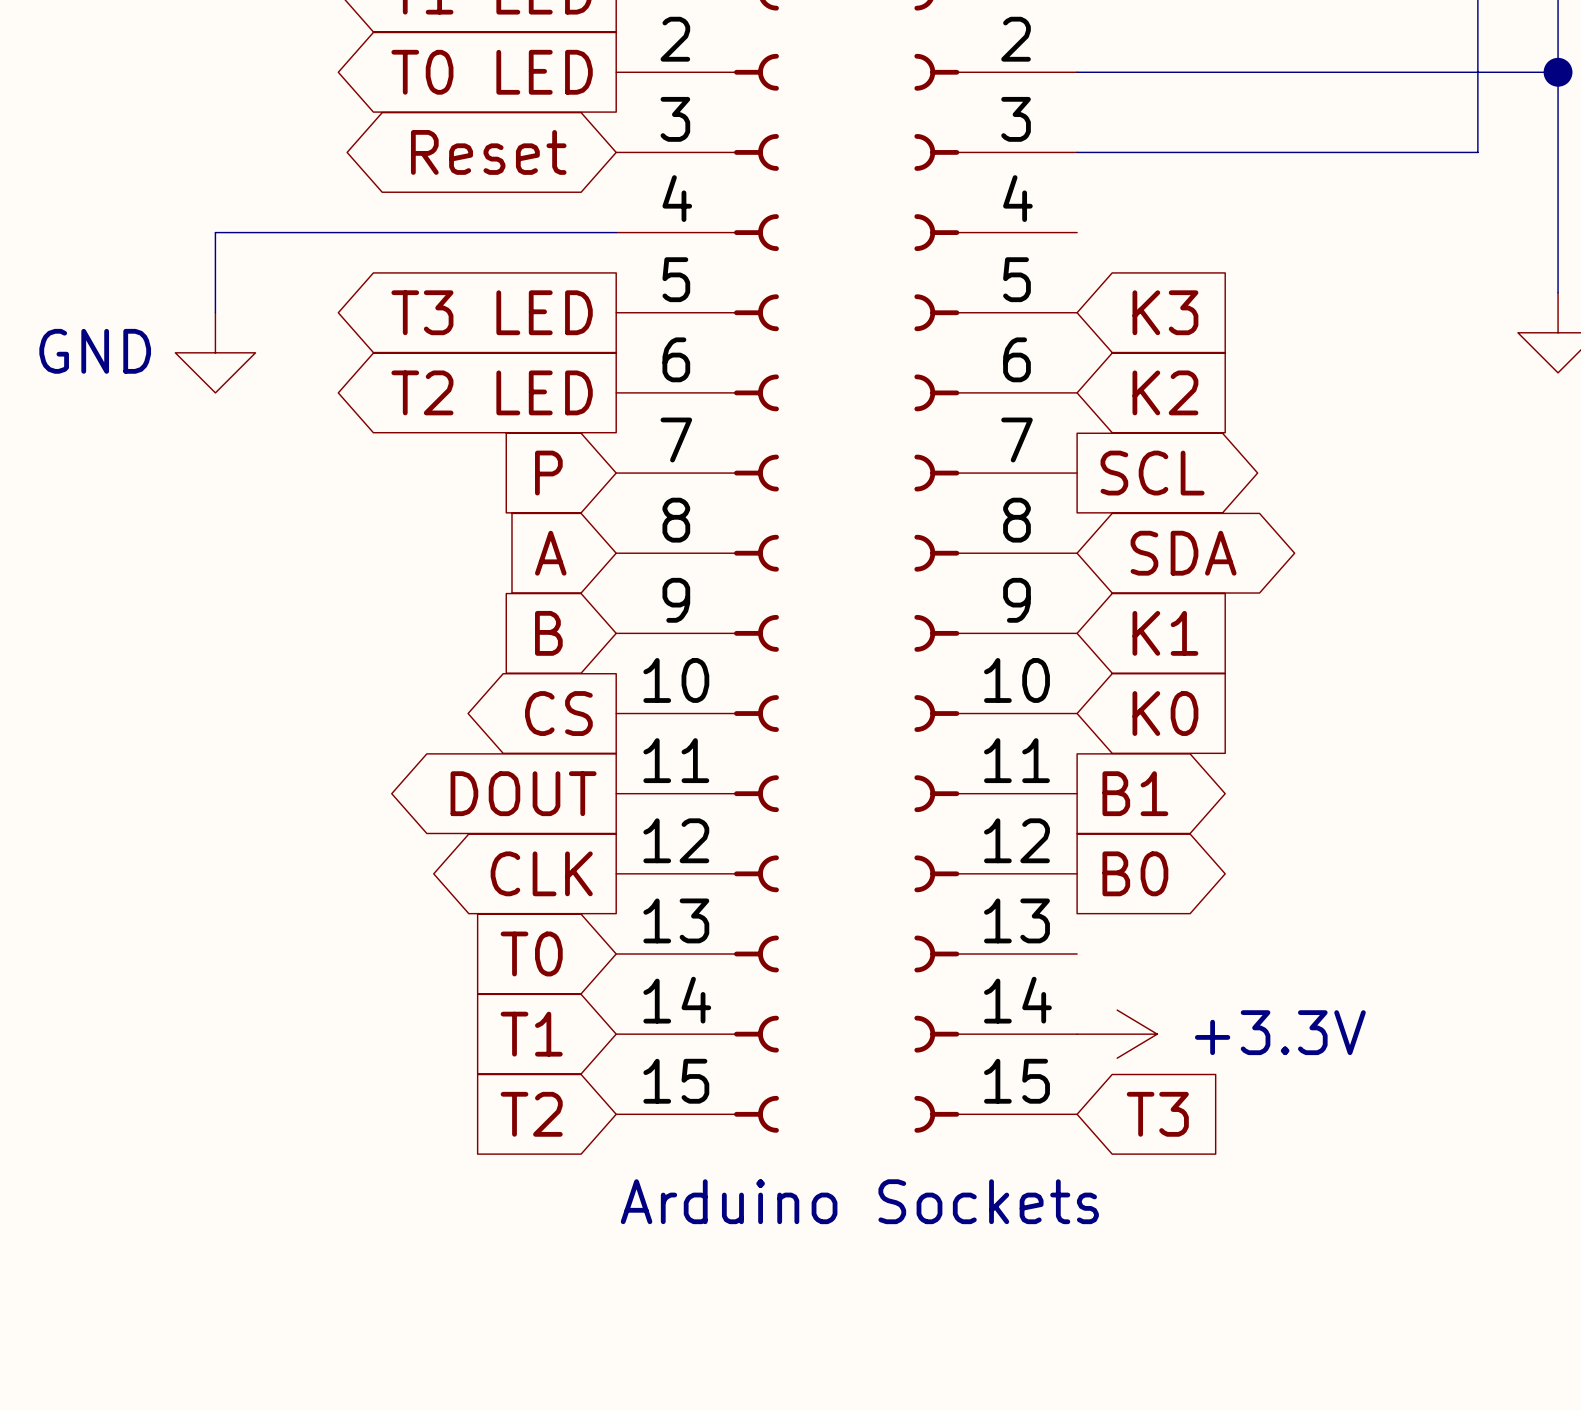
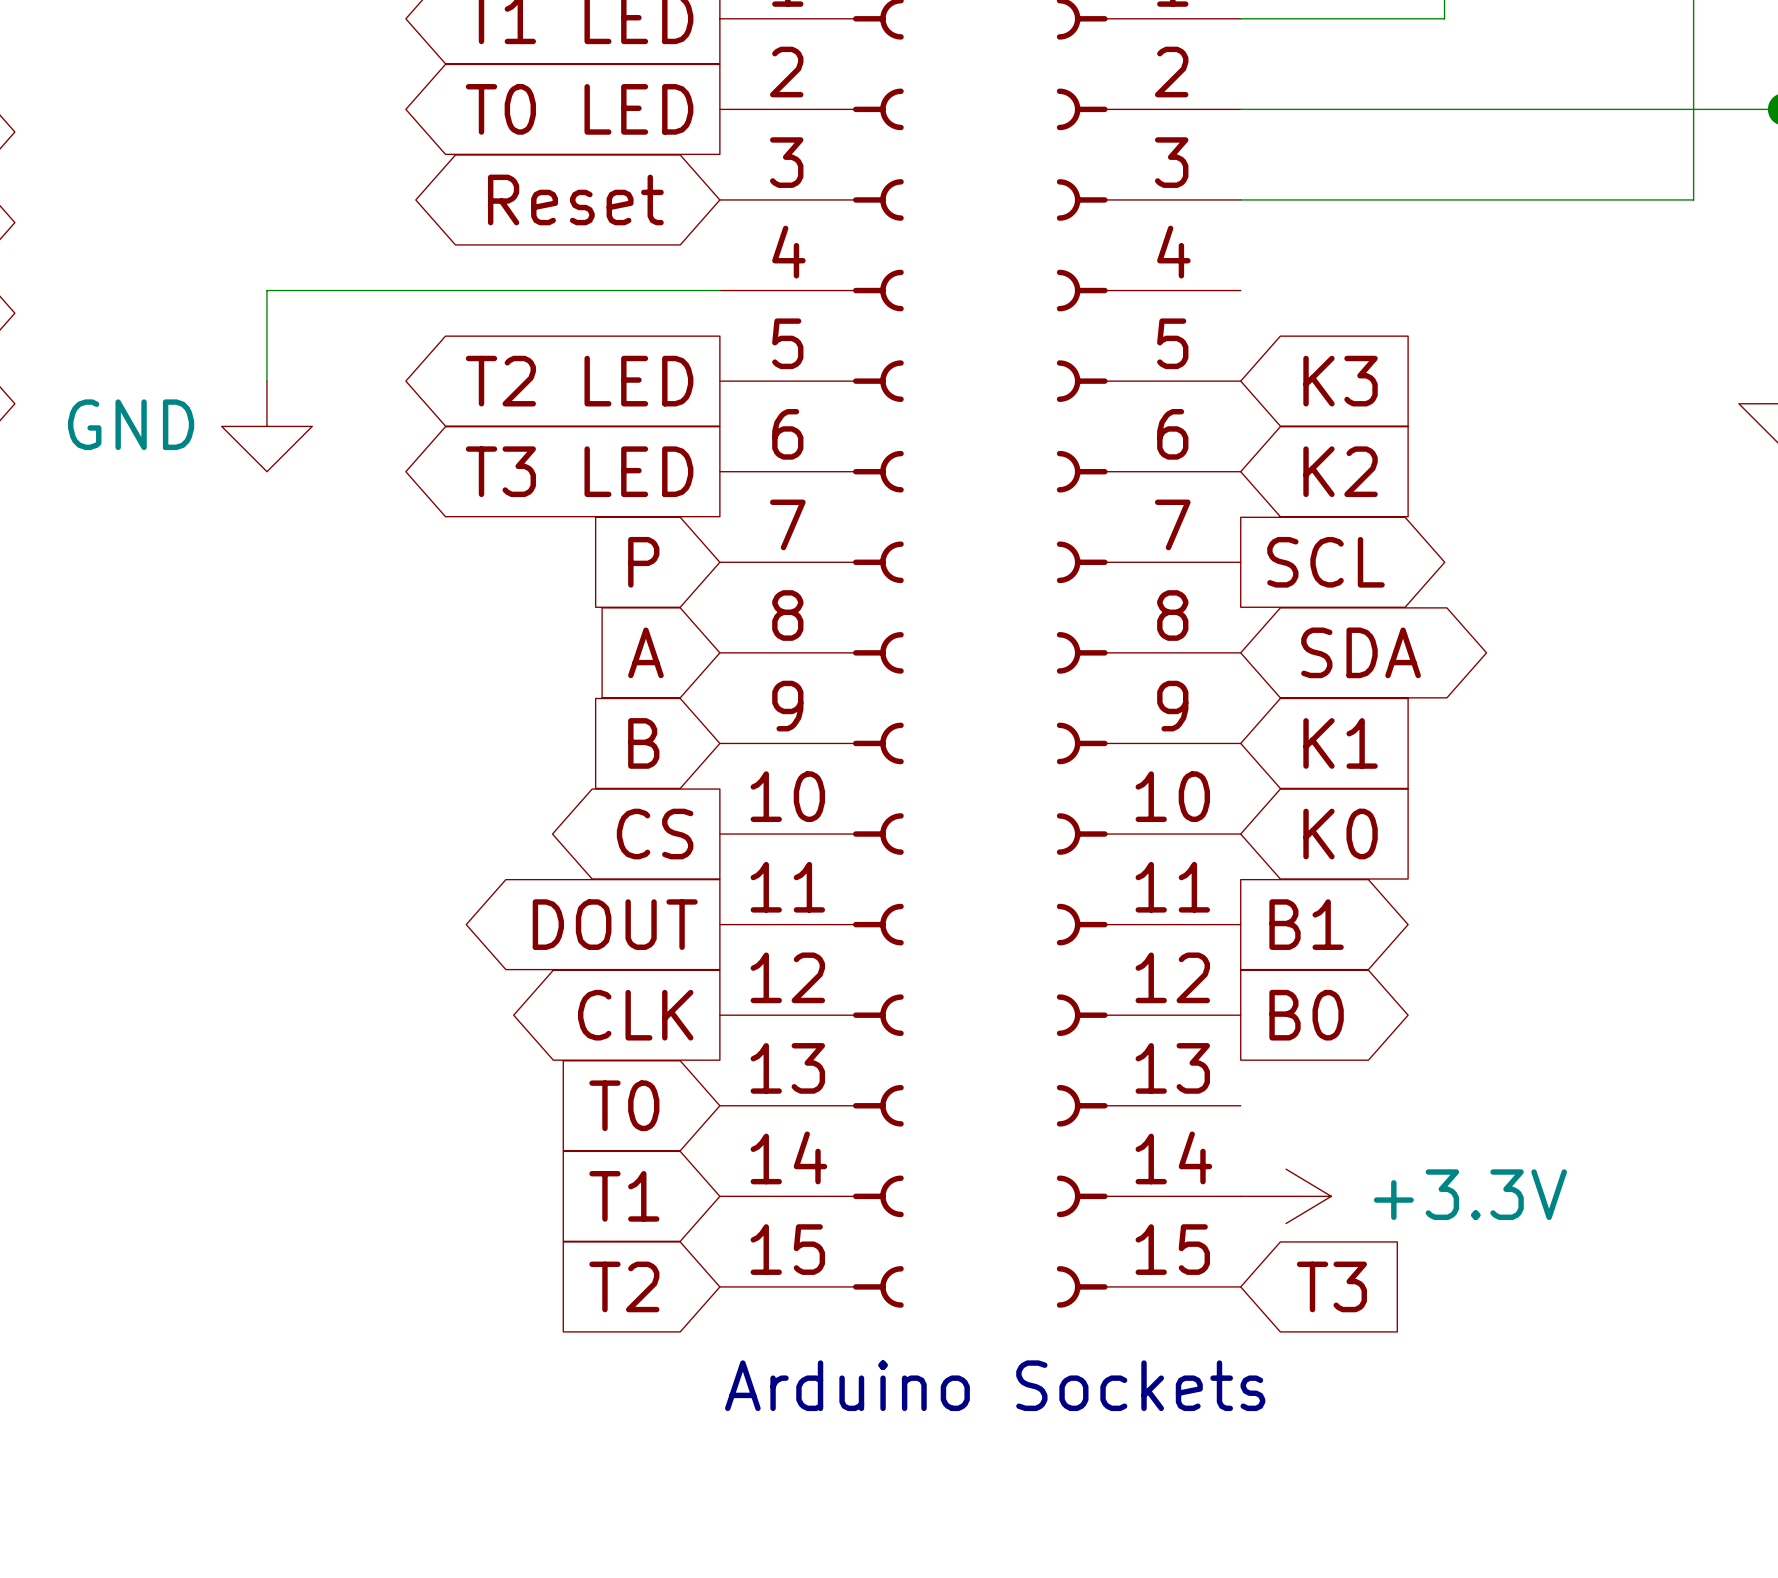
global label: T3 LED (492, 312) -> T2 LED (579, 381)
global label: T2 LED (492, 392) -> T3 LED (579, 471)

